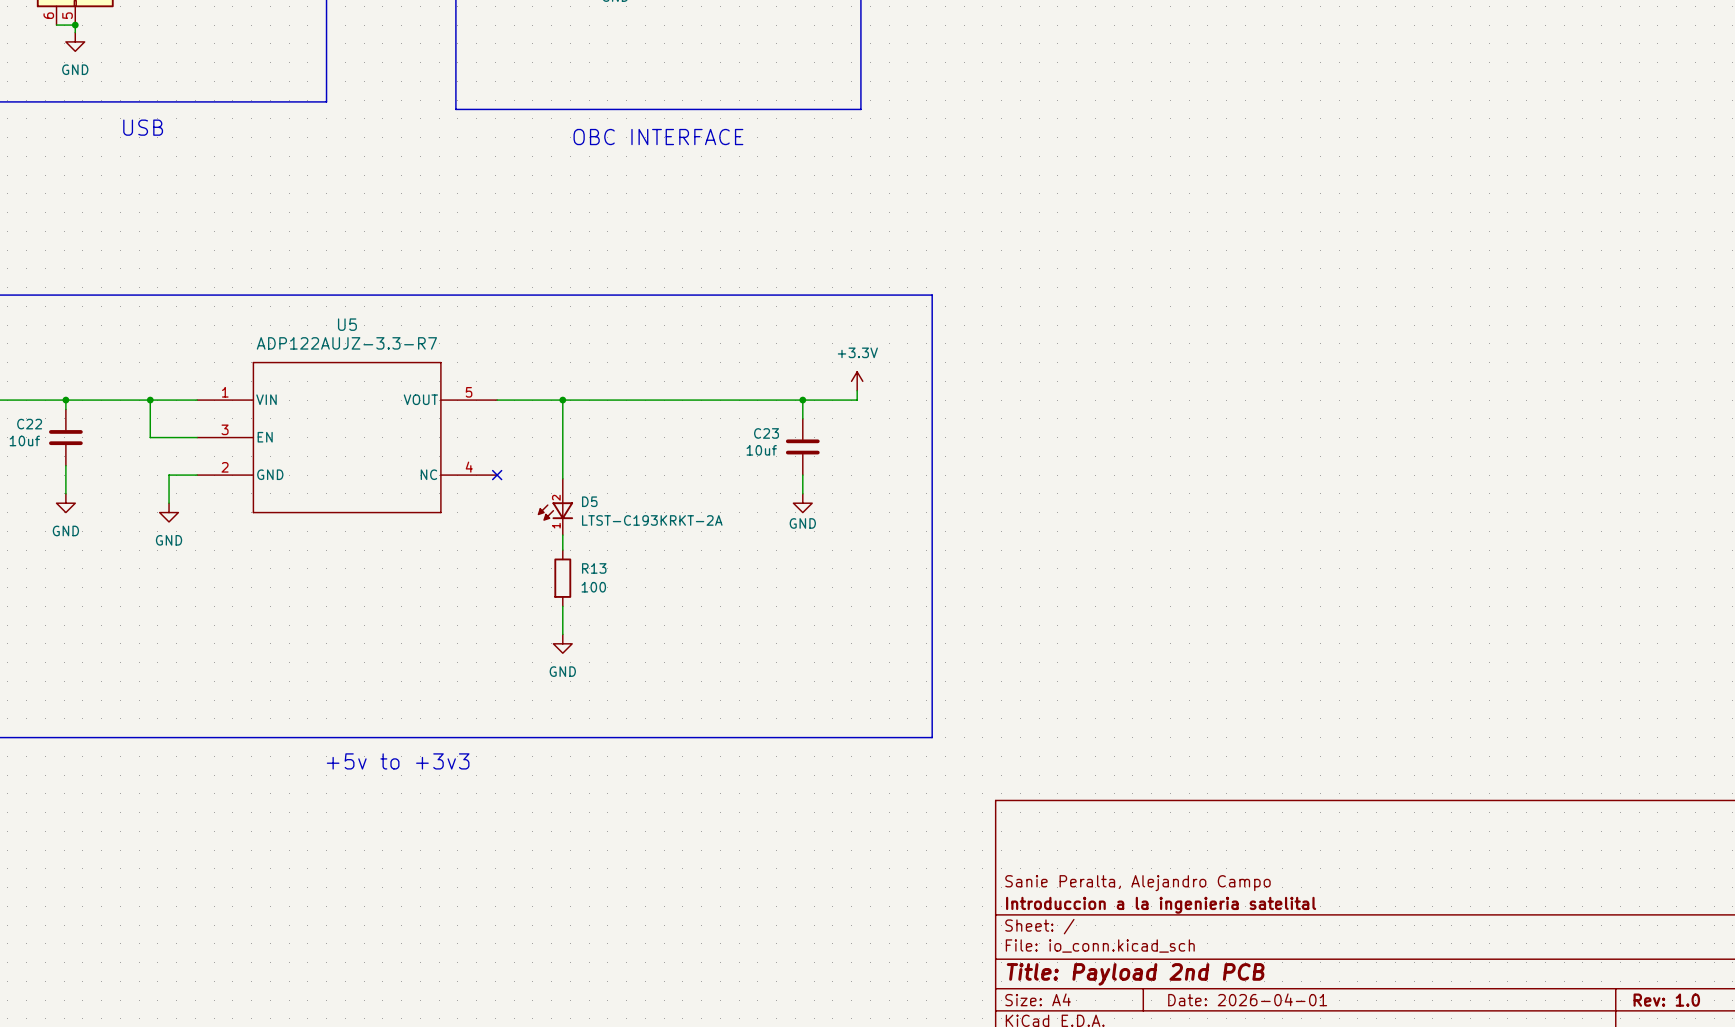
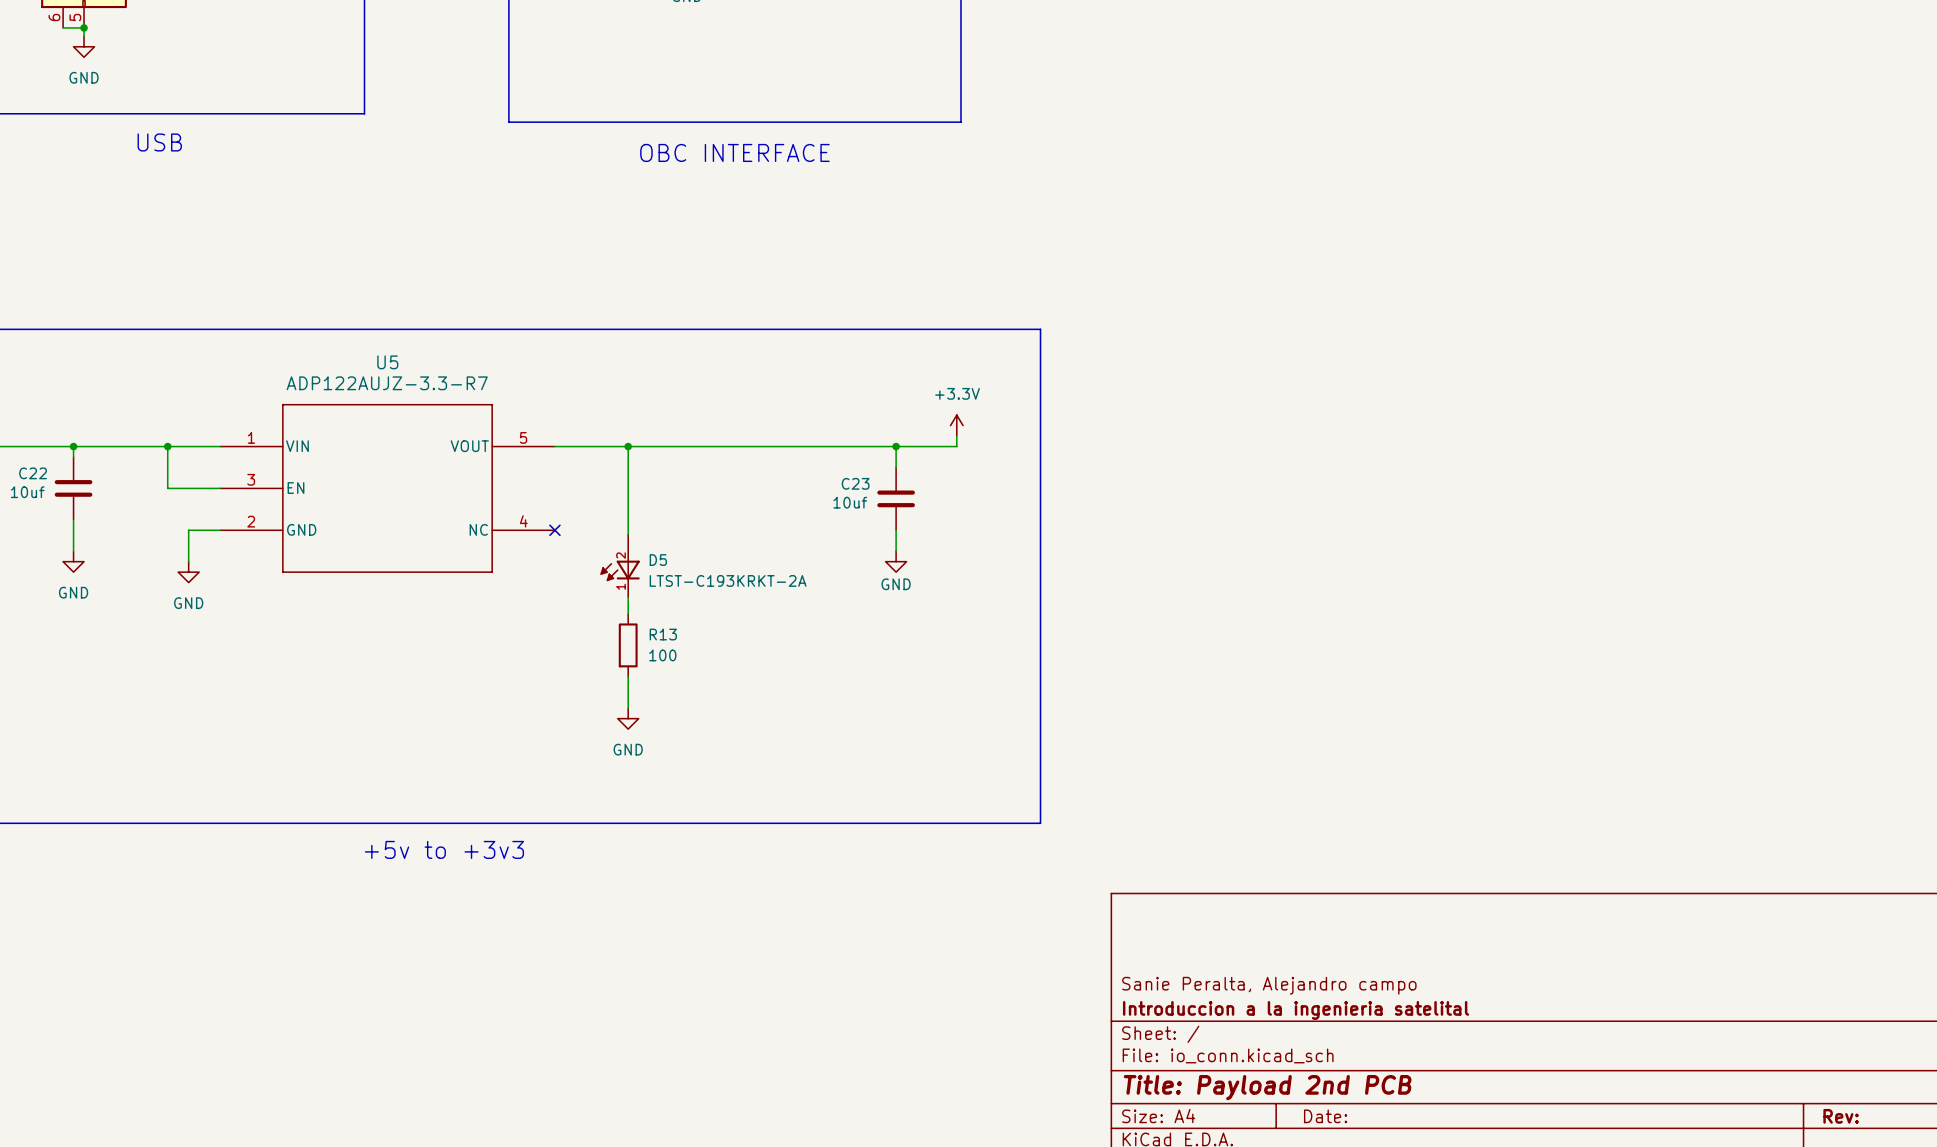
title block: Sanie Peralta, Alejandro Campo (1137, 883) -> Sanie Peralta, Alejandro campo (1269, 985)
title block: Date: 2026-04-01 (1247, 999) -> Date: (1325, 1116)
title block: Rev: 1.0 (1666, 1000) -> Rev: (1841, 1116)

